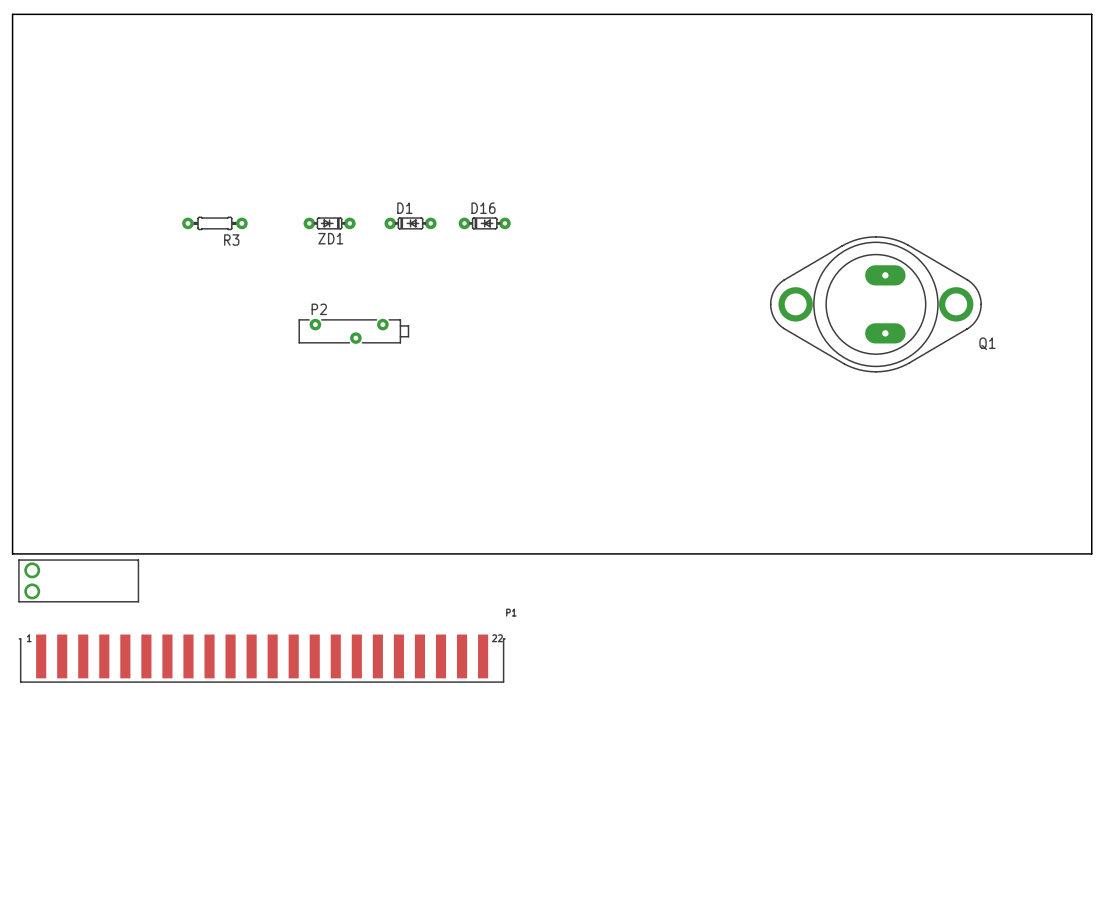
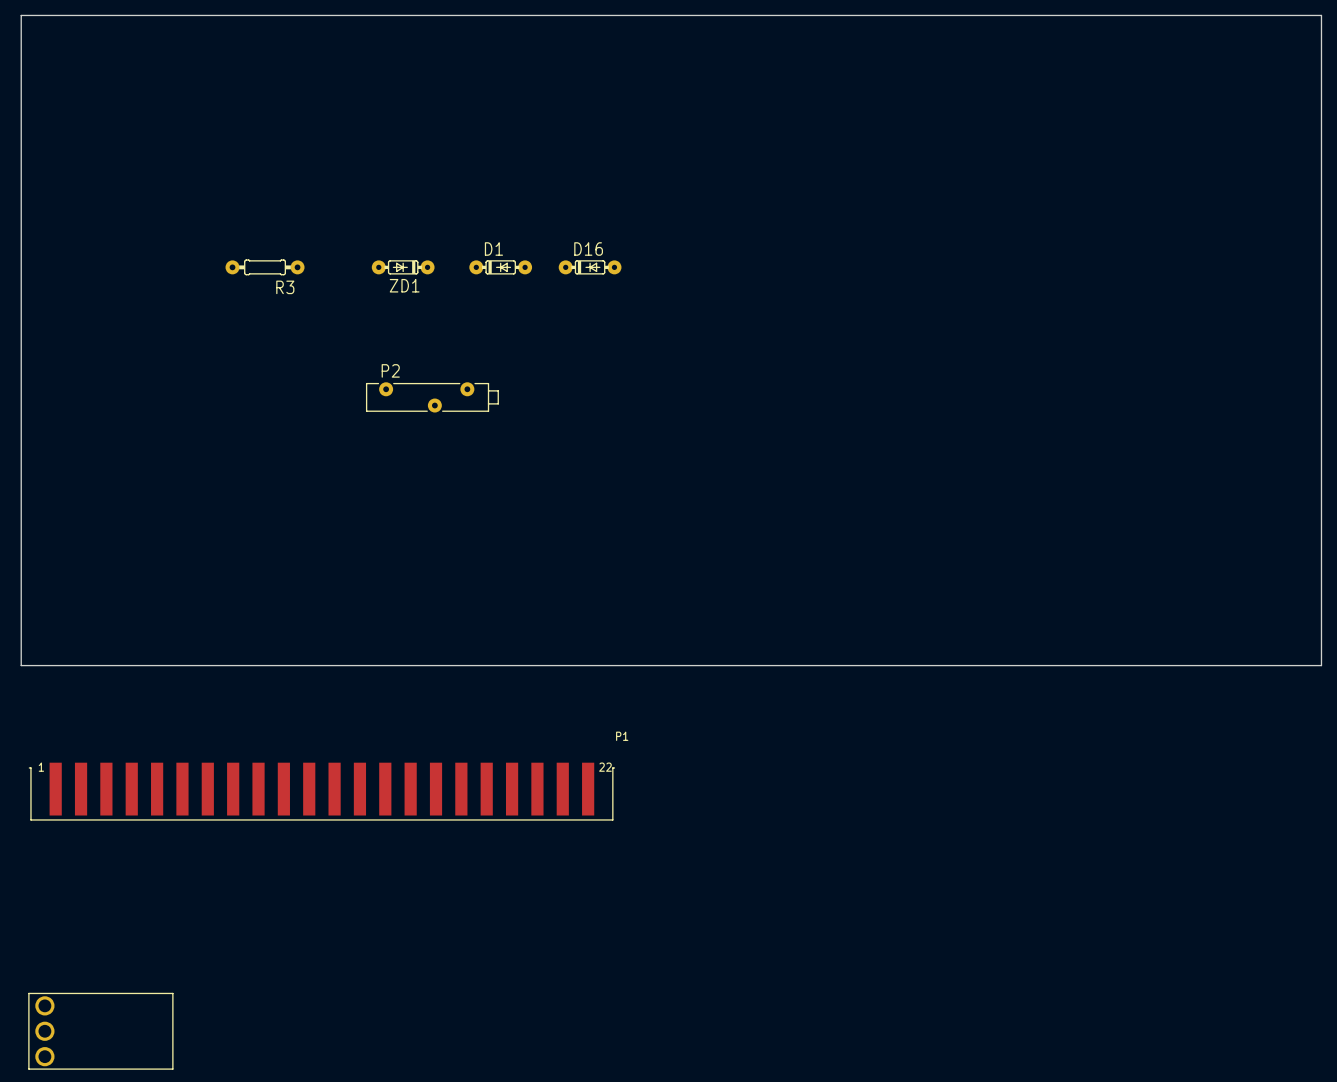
Q1: (875, 304) -> none
part: (78, 580) -> none
part: none -> (100, 1031)

